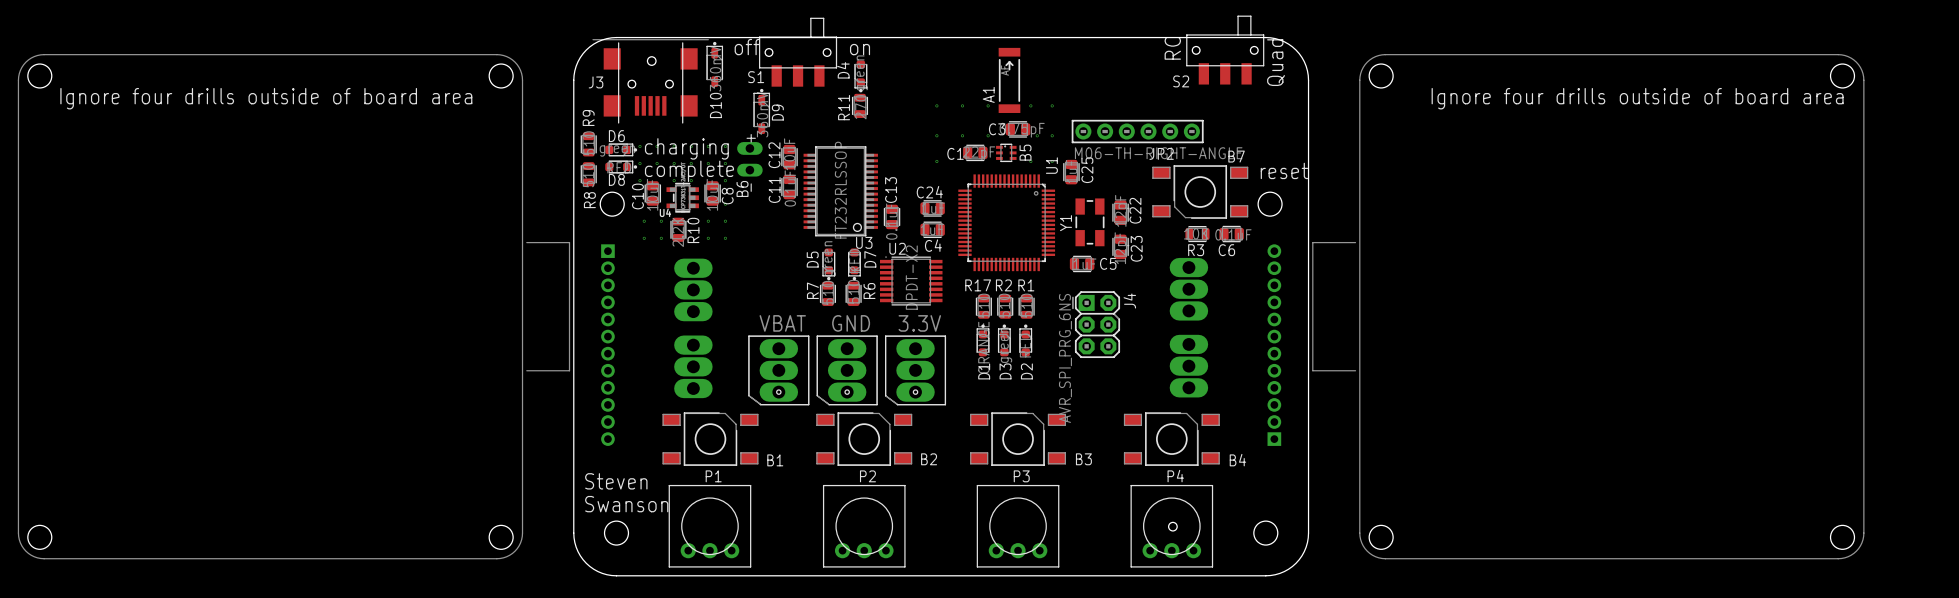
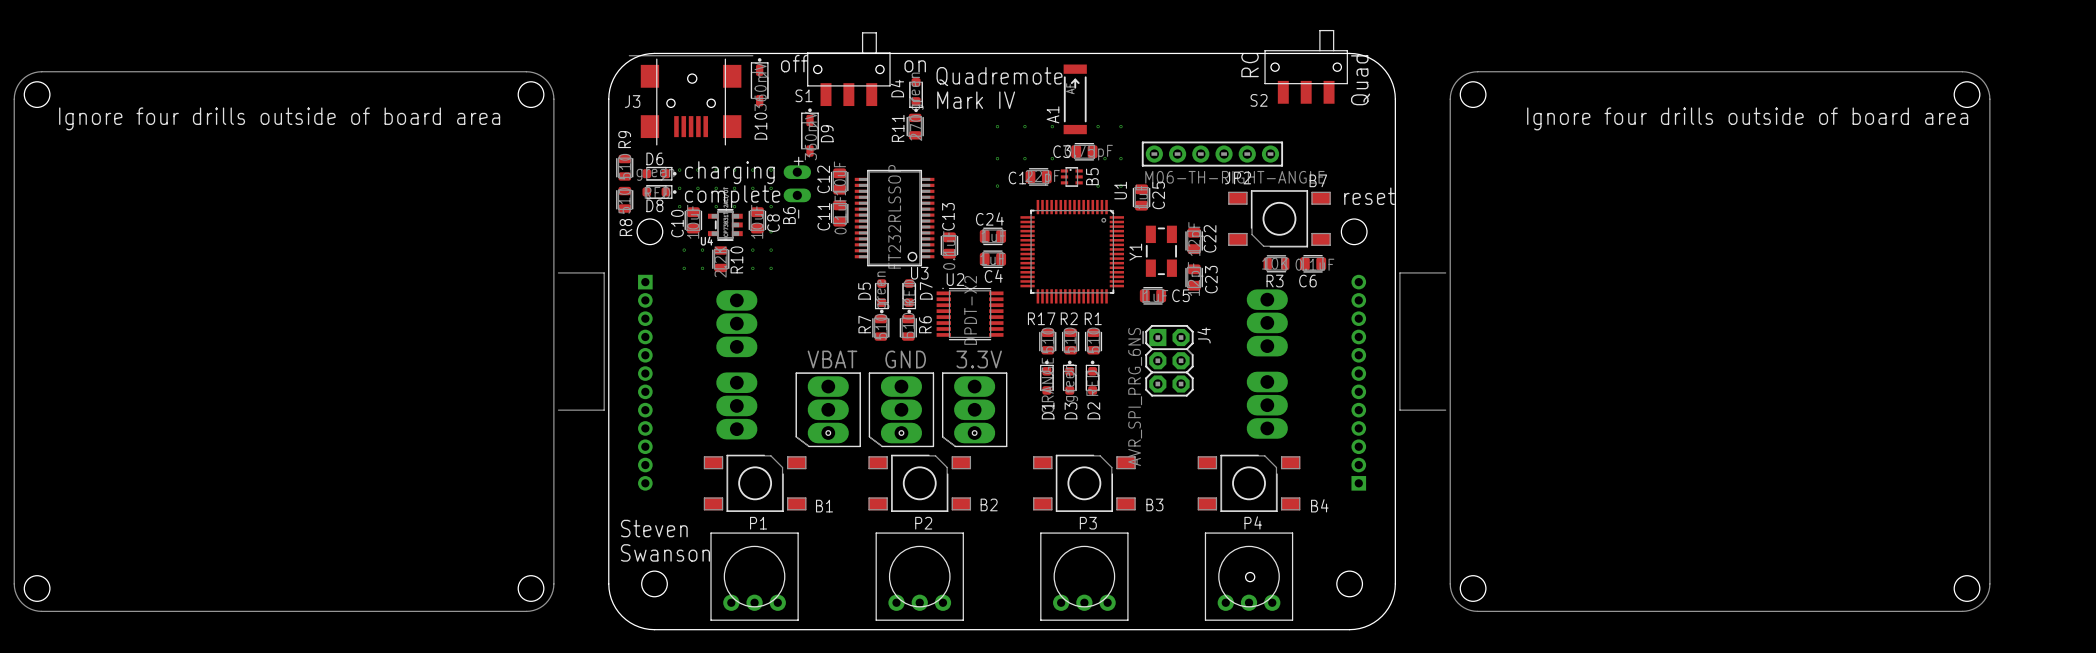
text: none -> Quadremote (999, 76)
text: none -> Mark IV (976, 100)

